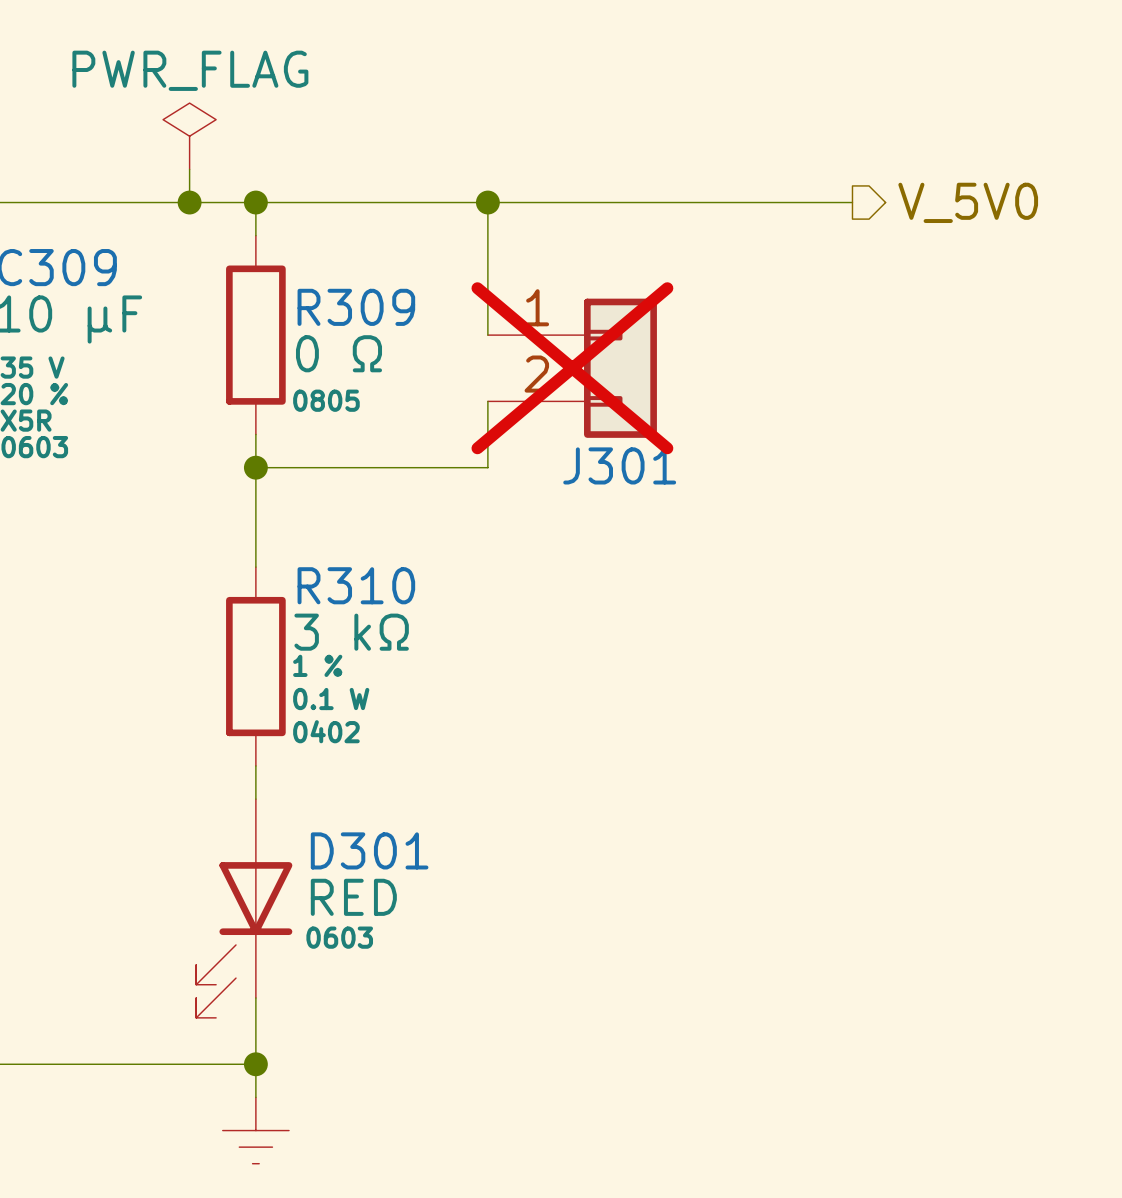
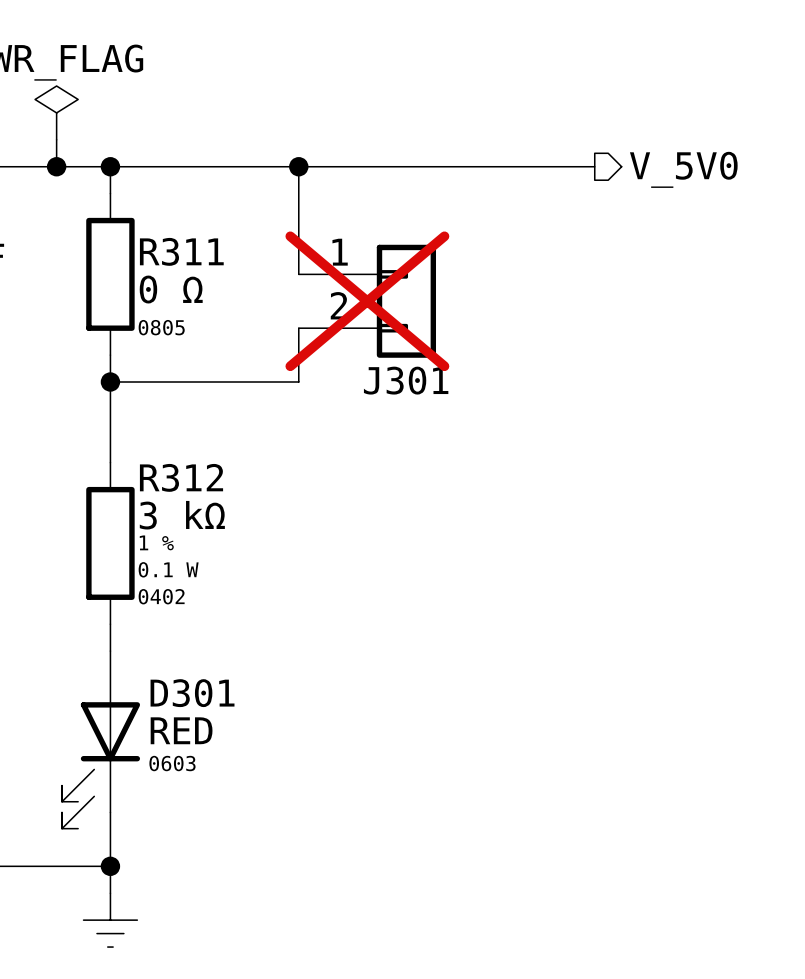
R309 name: R309 (356, 307) -> R311 (181, 251)
R310 name: R310 (356, 585) -> R312 (181, 477)

